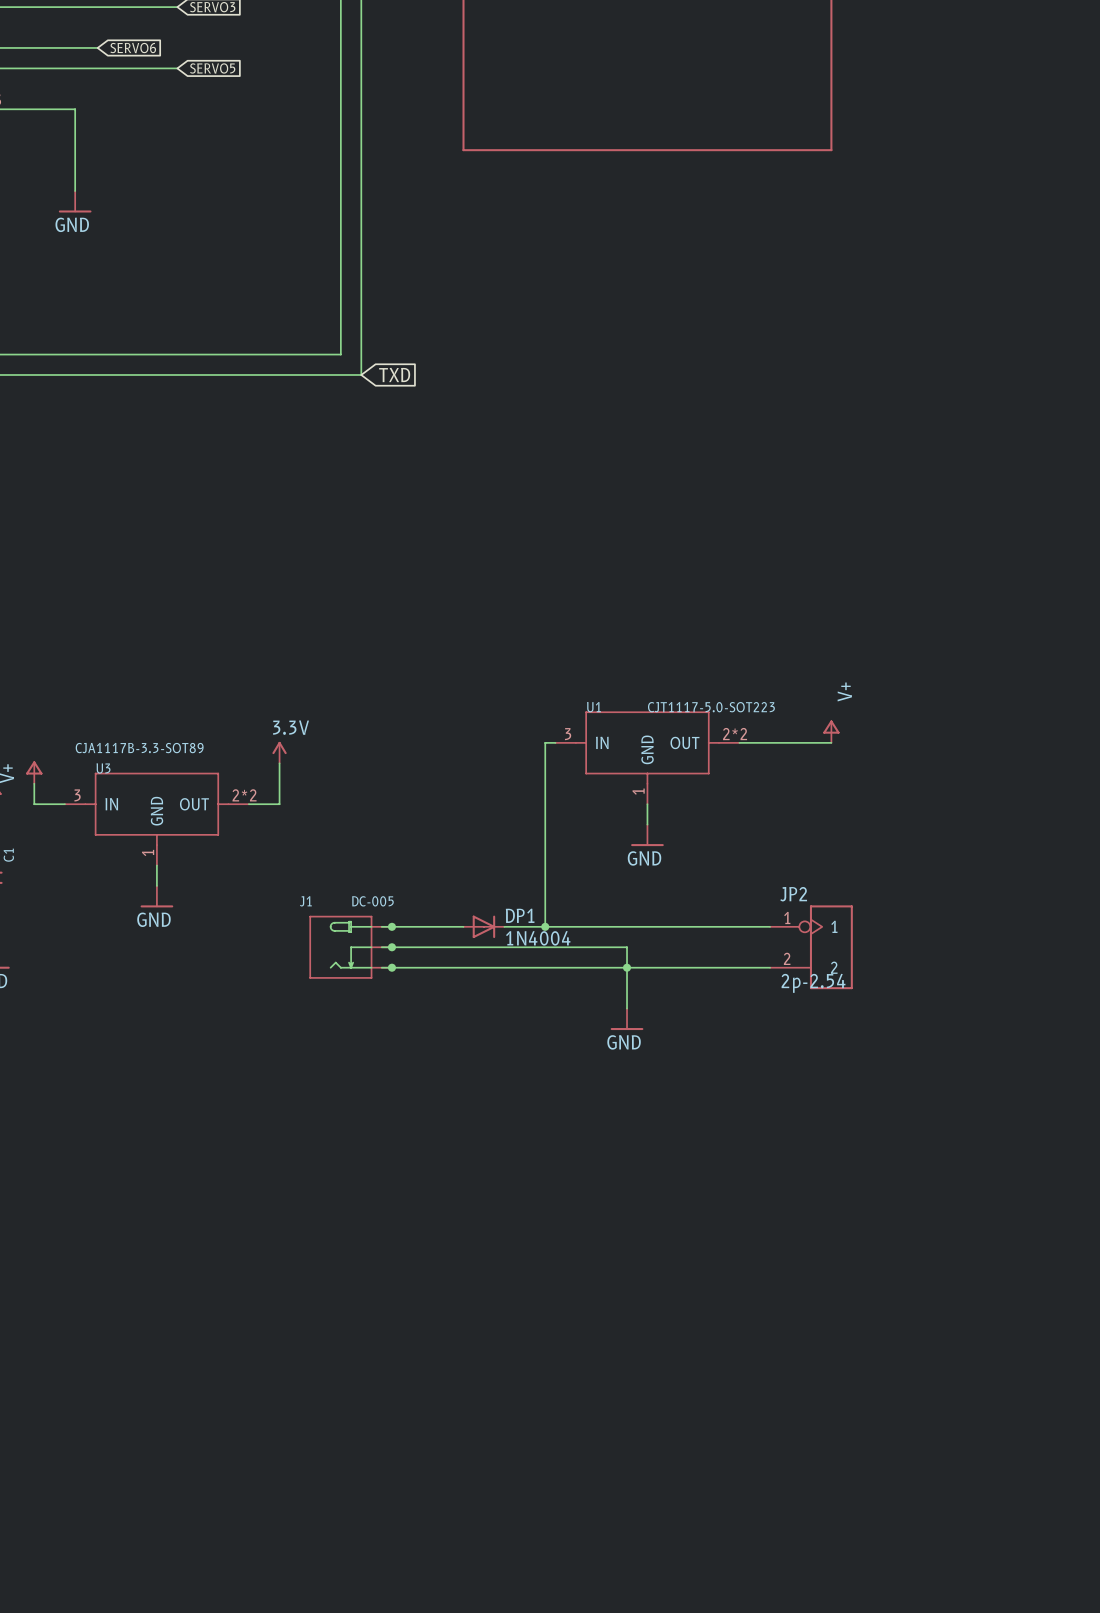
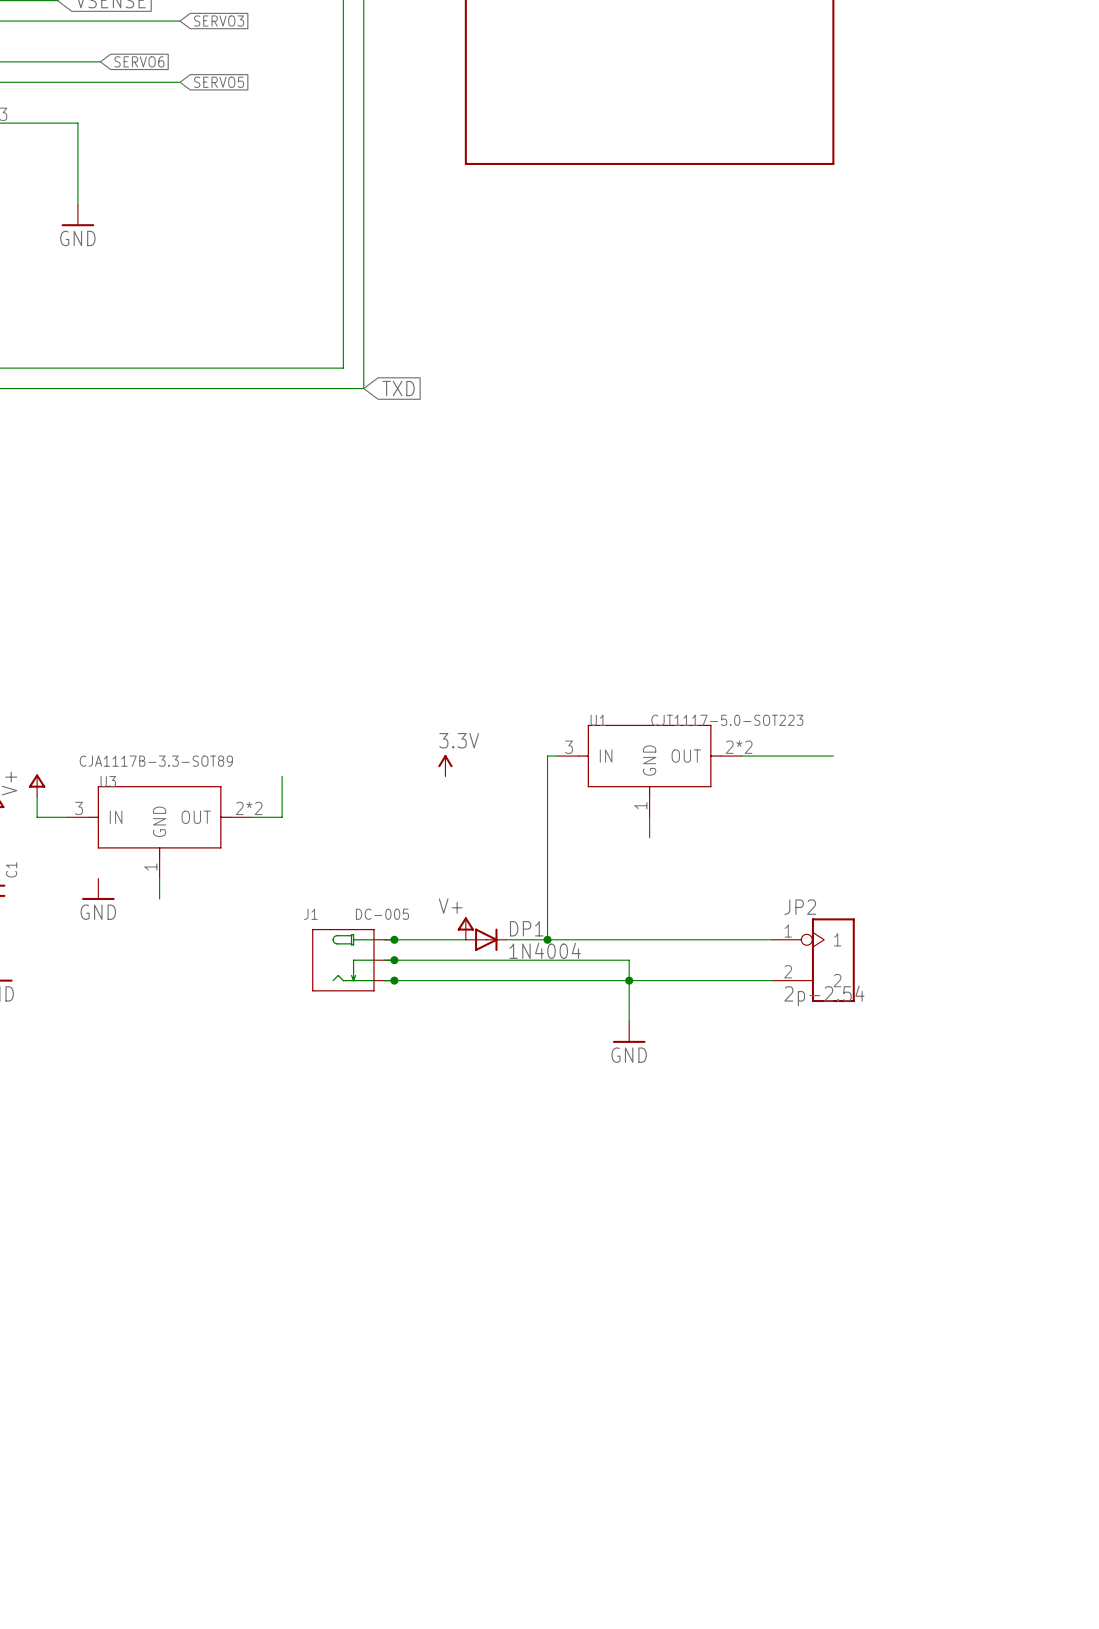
power symbol: V+ (831, 731) -> none
power symbol position: 3.3V (279, 752) -> 3.3V (445, 765)
power symbol: GND (647, 835) -> none
power symbol position: GND (156, 896) -> GND (98, 889)
power symbol: none -> V+ (465, 928)

